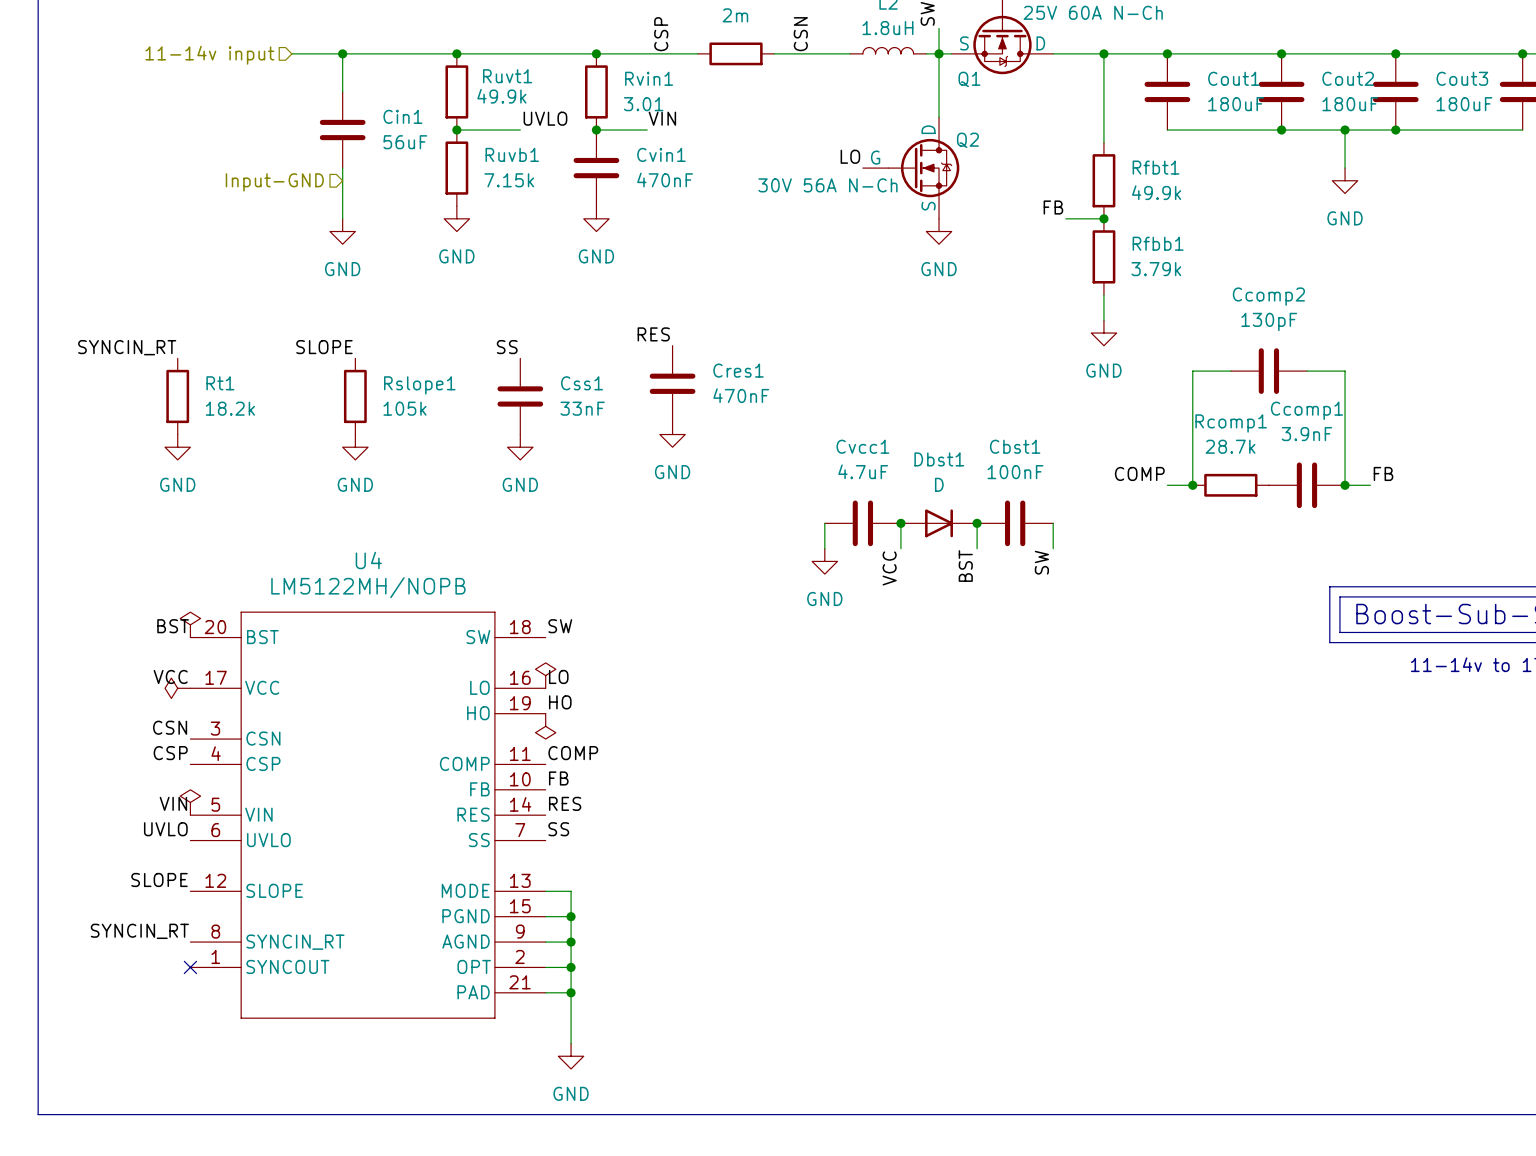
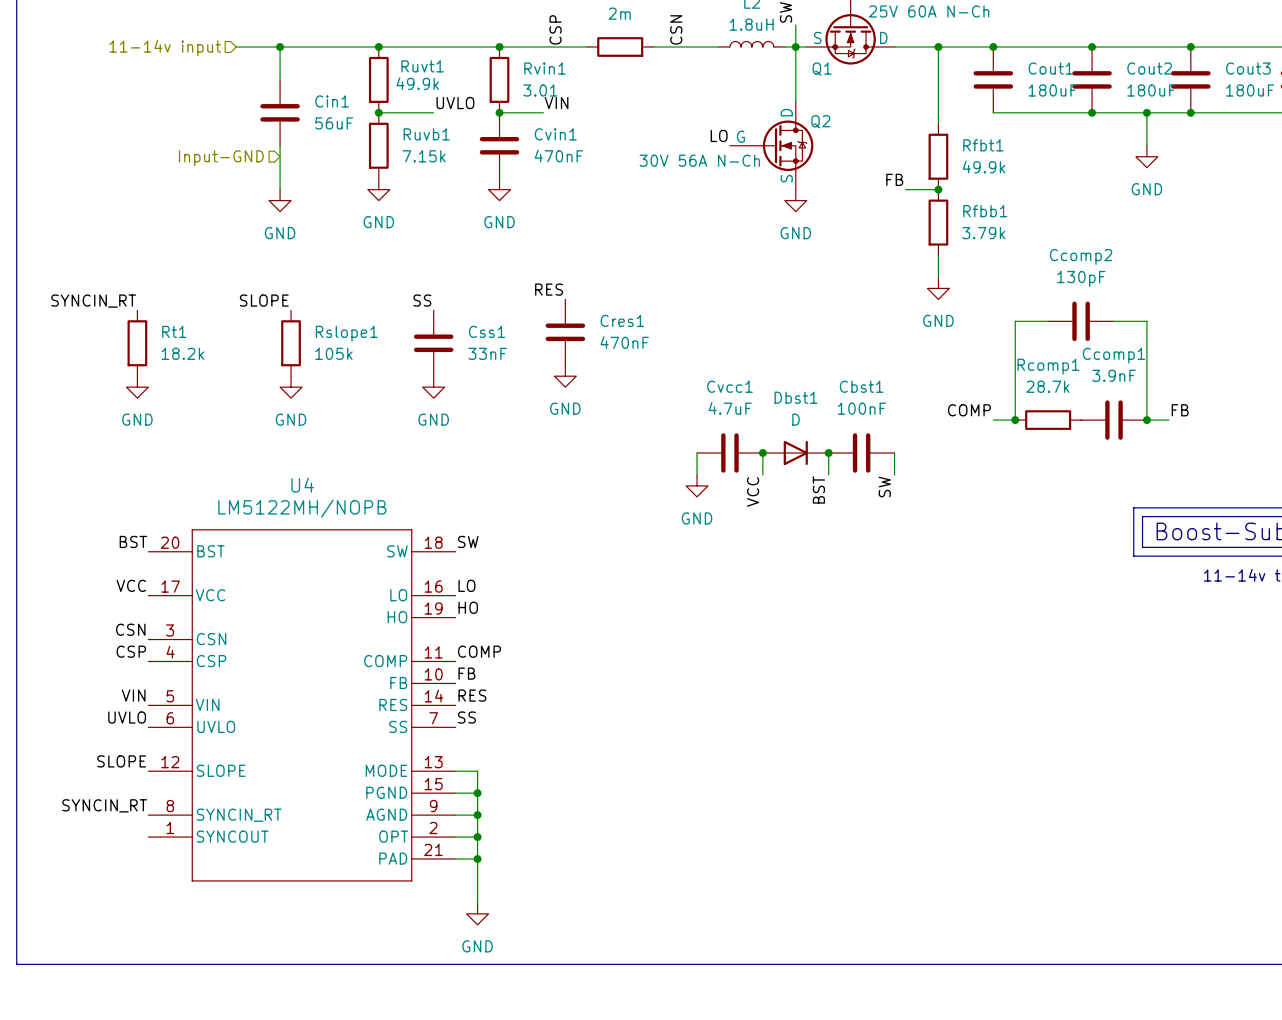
power symbol: (190, 624) -> none
power symbol: (545, 675) -> none
power symbol: (177, 688) -> none
power symbol: (545, 726) -> none
power symbol: (190, 802) -> none
no-connect mark: (190, 967) -> none

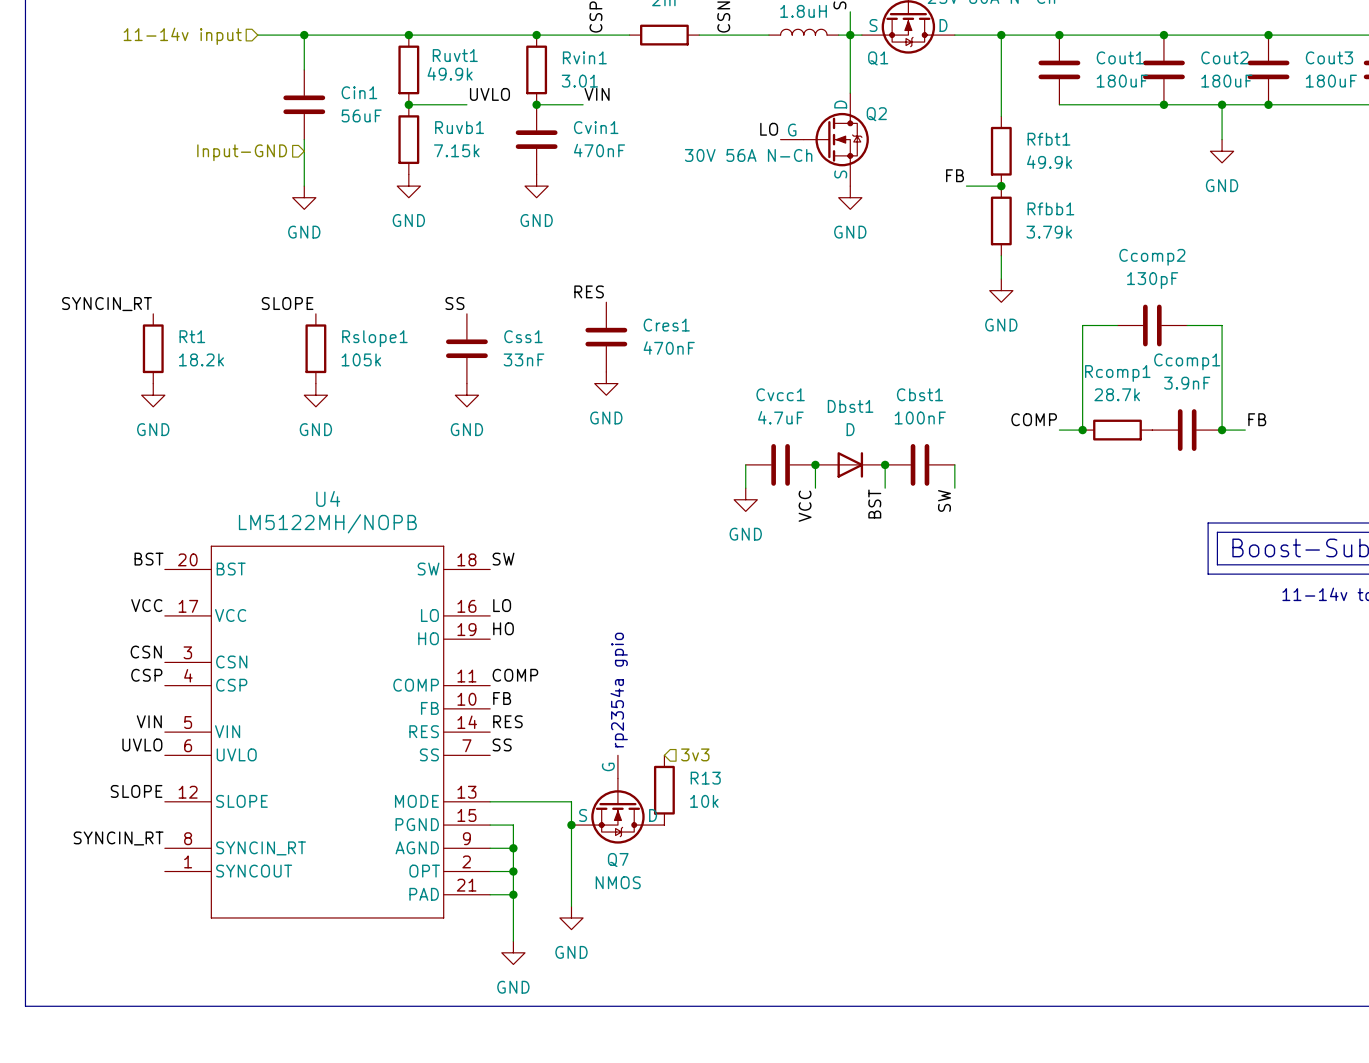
text: none -> rp2354a gpio (619, 690)
hierarchical label: none -> 3v3 (695, 754)
R13: none -> 10k (664, 790)
Q7: none -> NMOS (617, 799)
wire: (477, 771) (477, 793) -> (513, 801) (571, 801) (571, 906)
junction: (477, 793) -> none
junction: none -> (571, 825)
power symbol: none -> GND (571, 917)

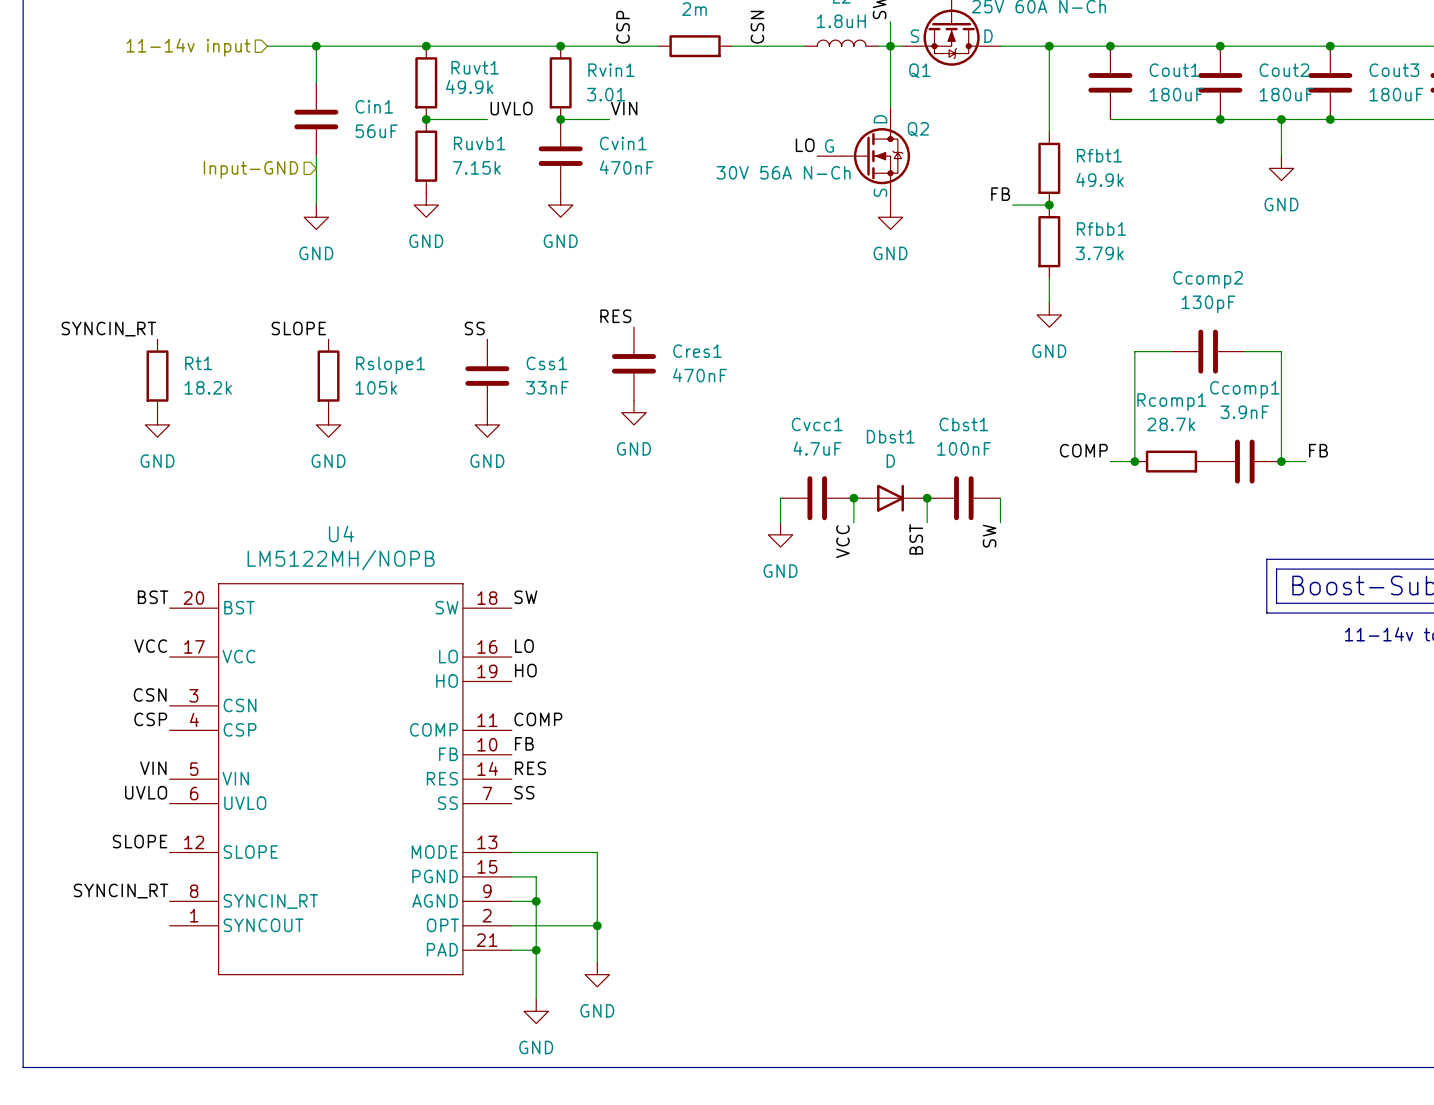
text: rp2354a gpio (619, 690) -> none
hierarchical label: 3v3 (695, 754) -> none
R13: 10k (664, 790) -> none
Q7: NMOS (617, 799) -> none
junction: (571, 825) -> none
wire: none -> (536, 925) (597, 925)
junction: (513, 871) -> none
junction: none -> (597, 925)

